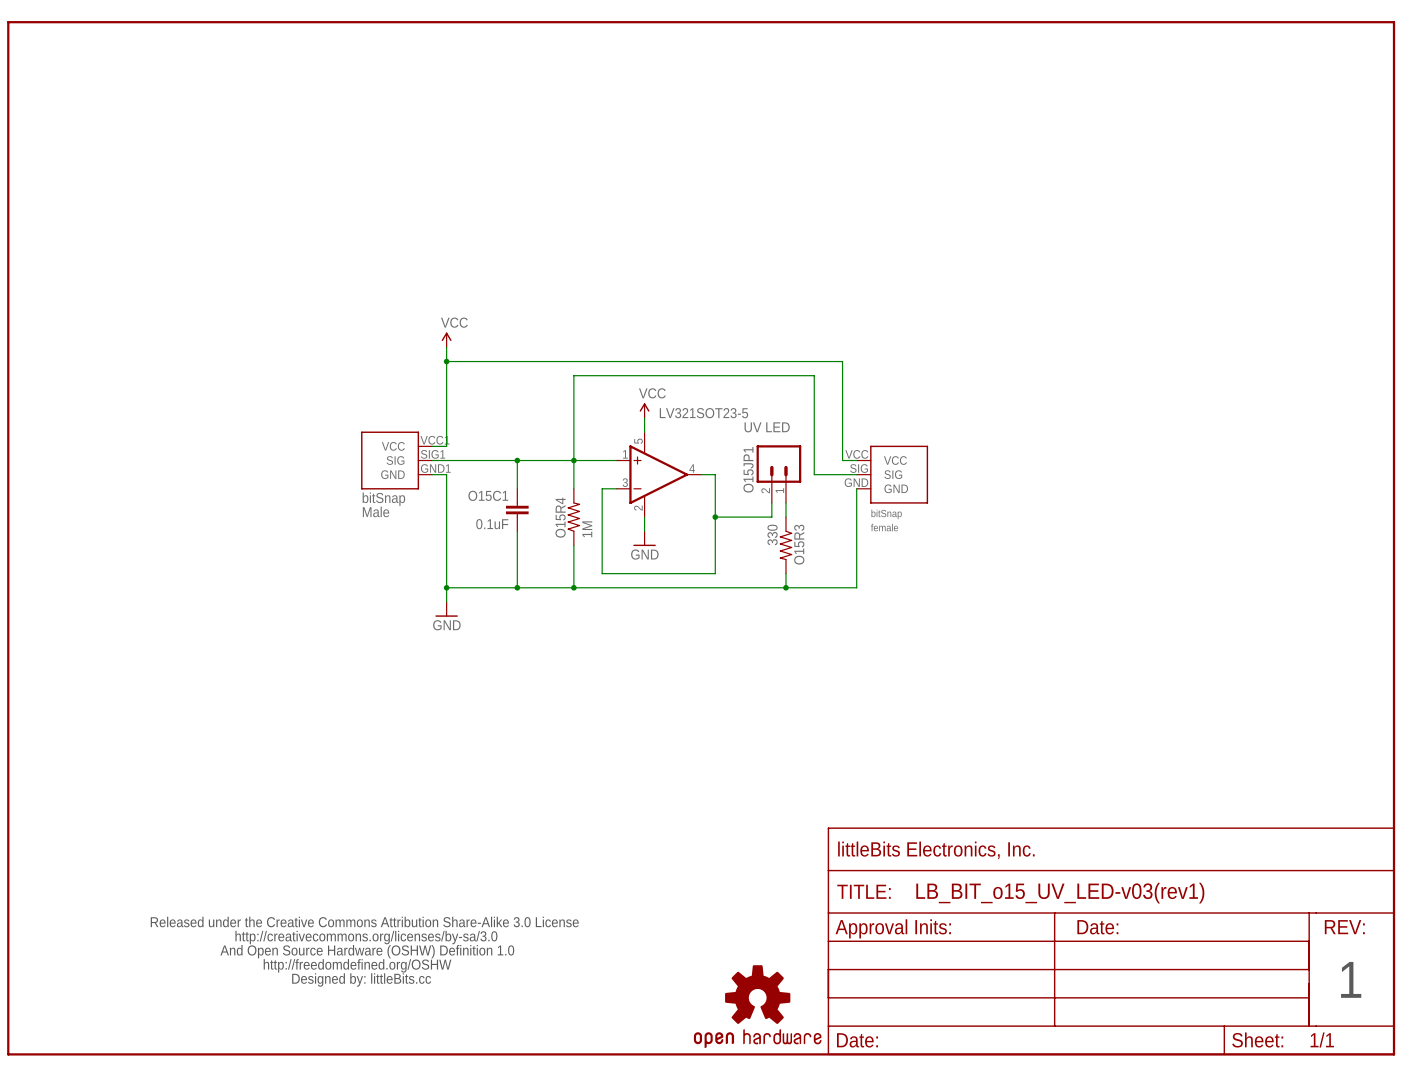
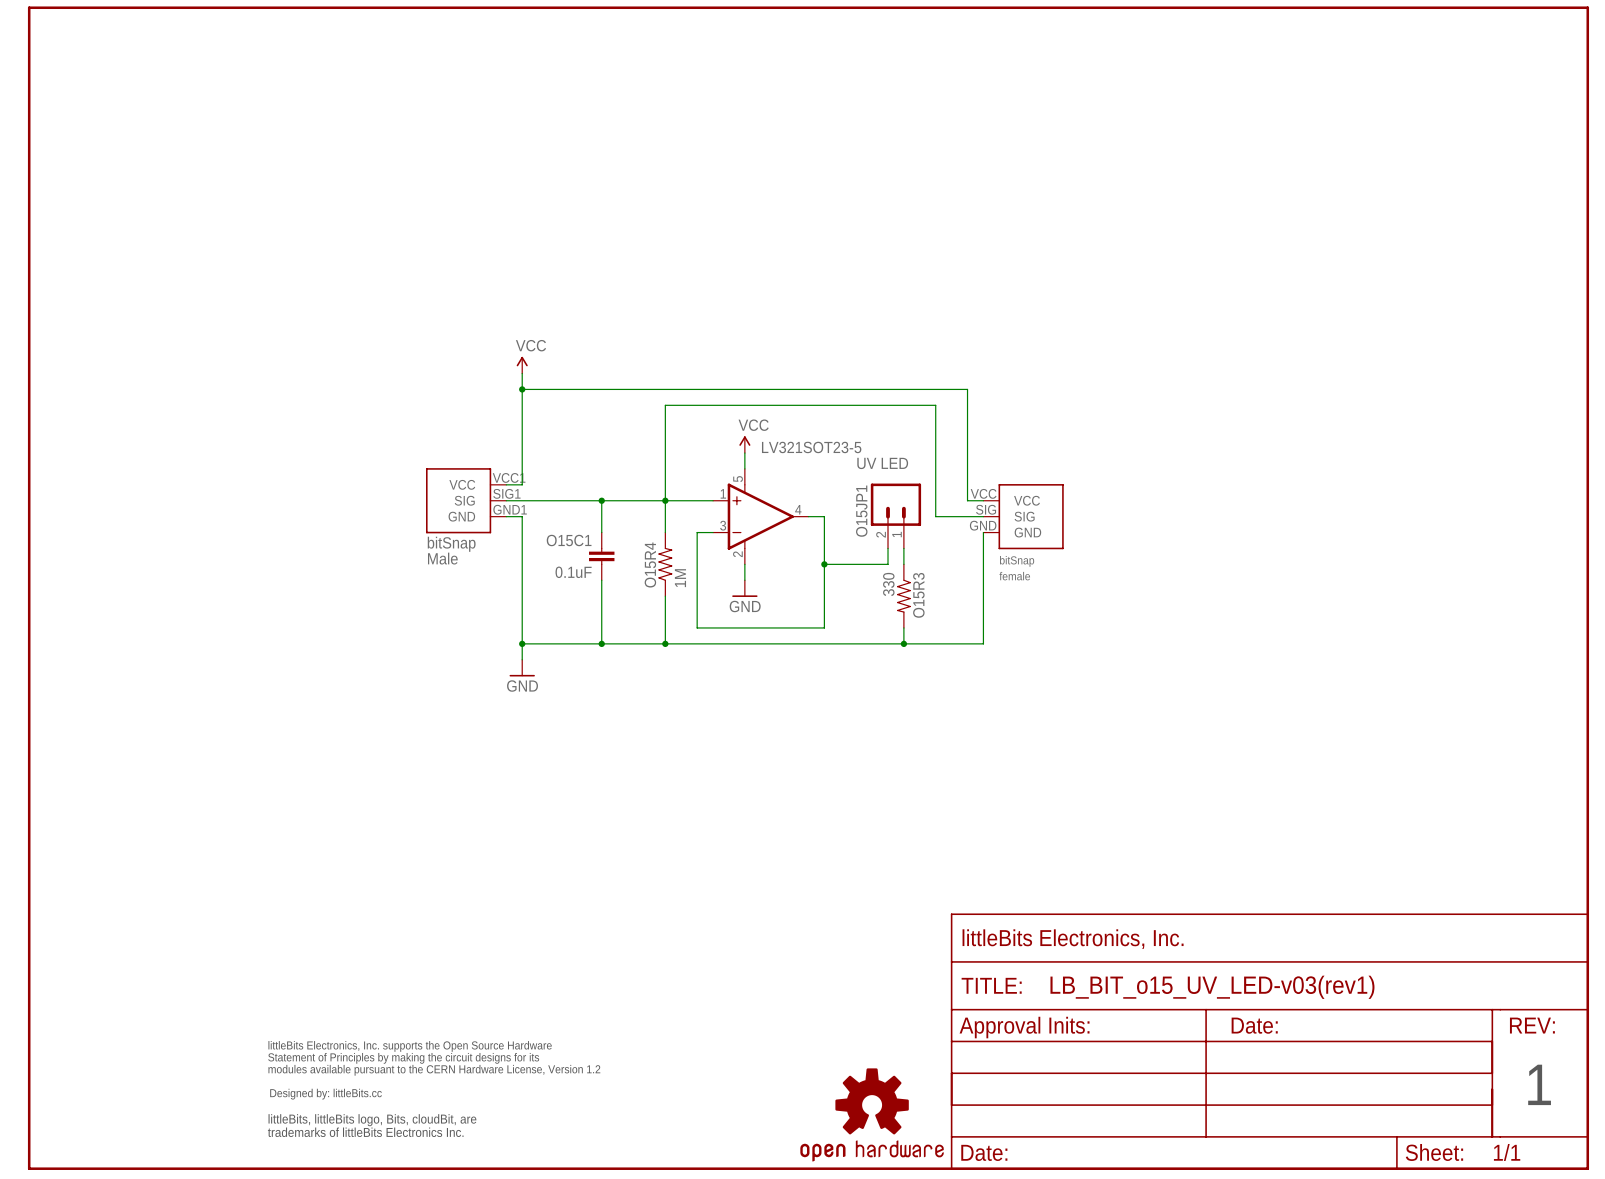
part: (364, 951) -> none
part: none -> (434, 1089)

